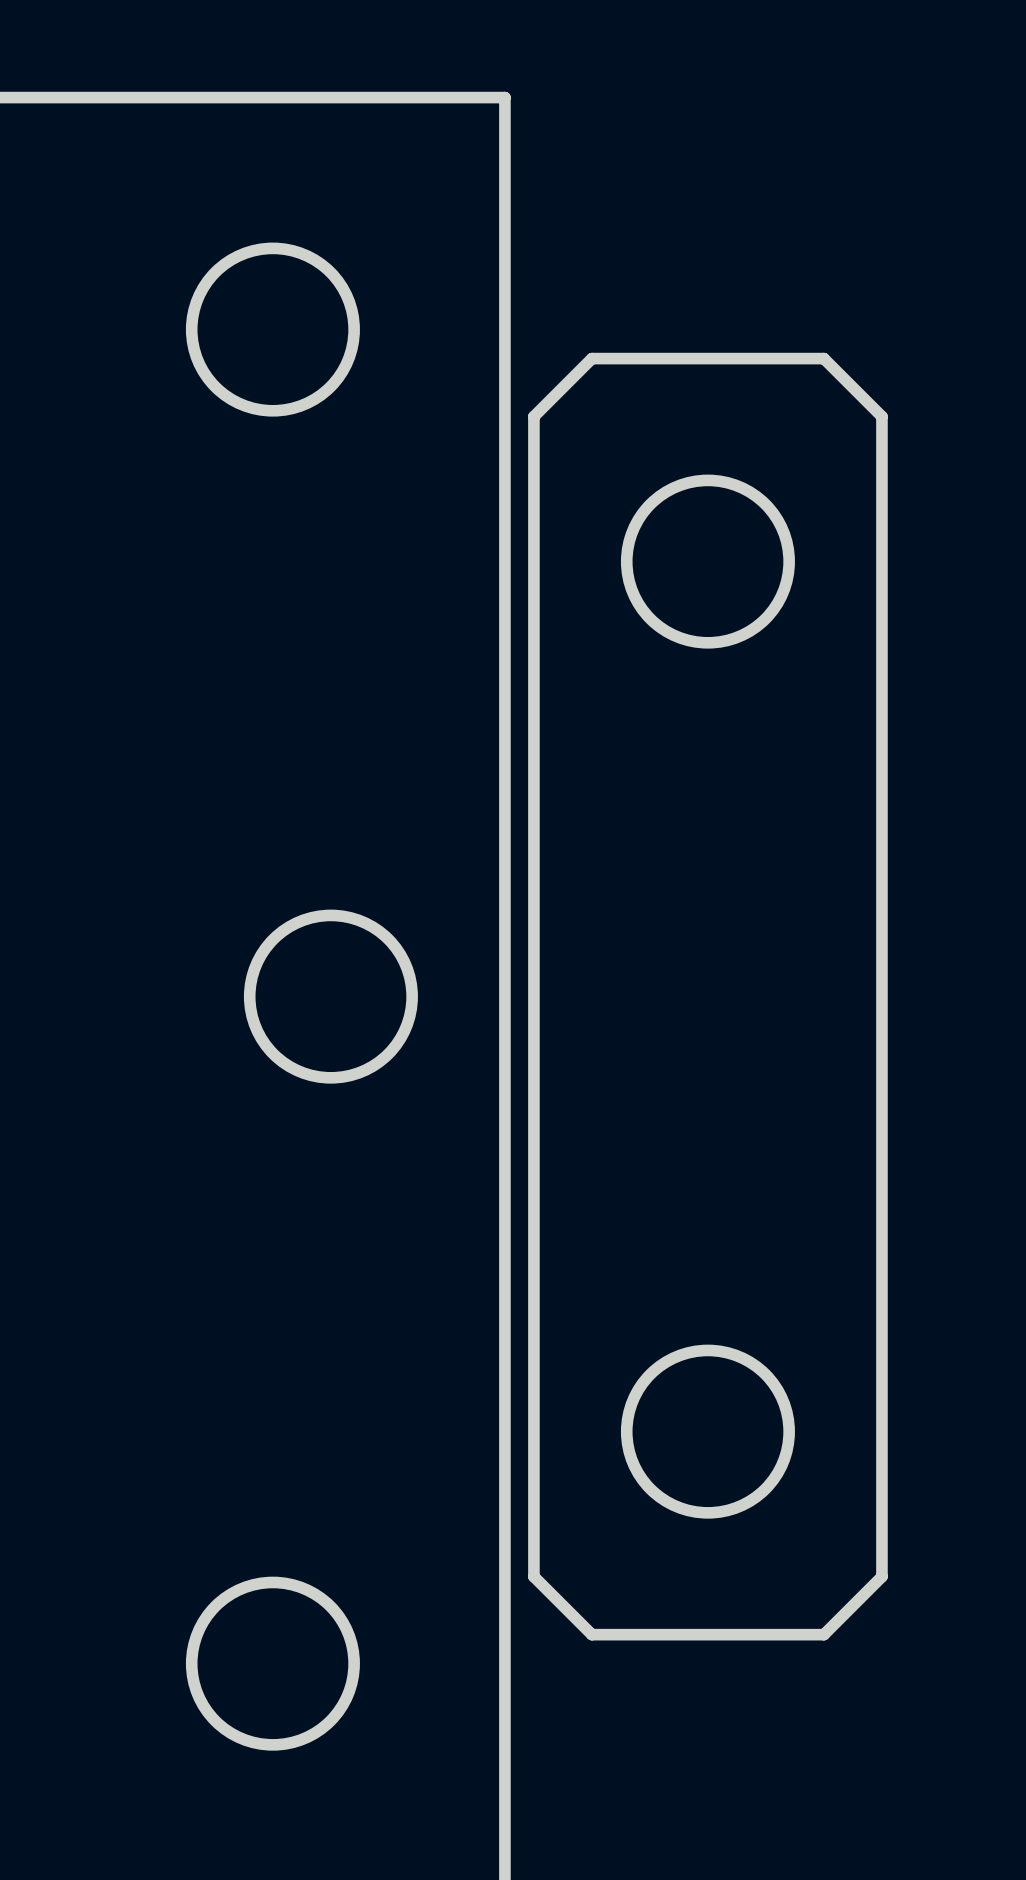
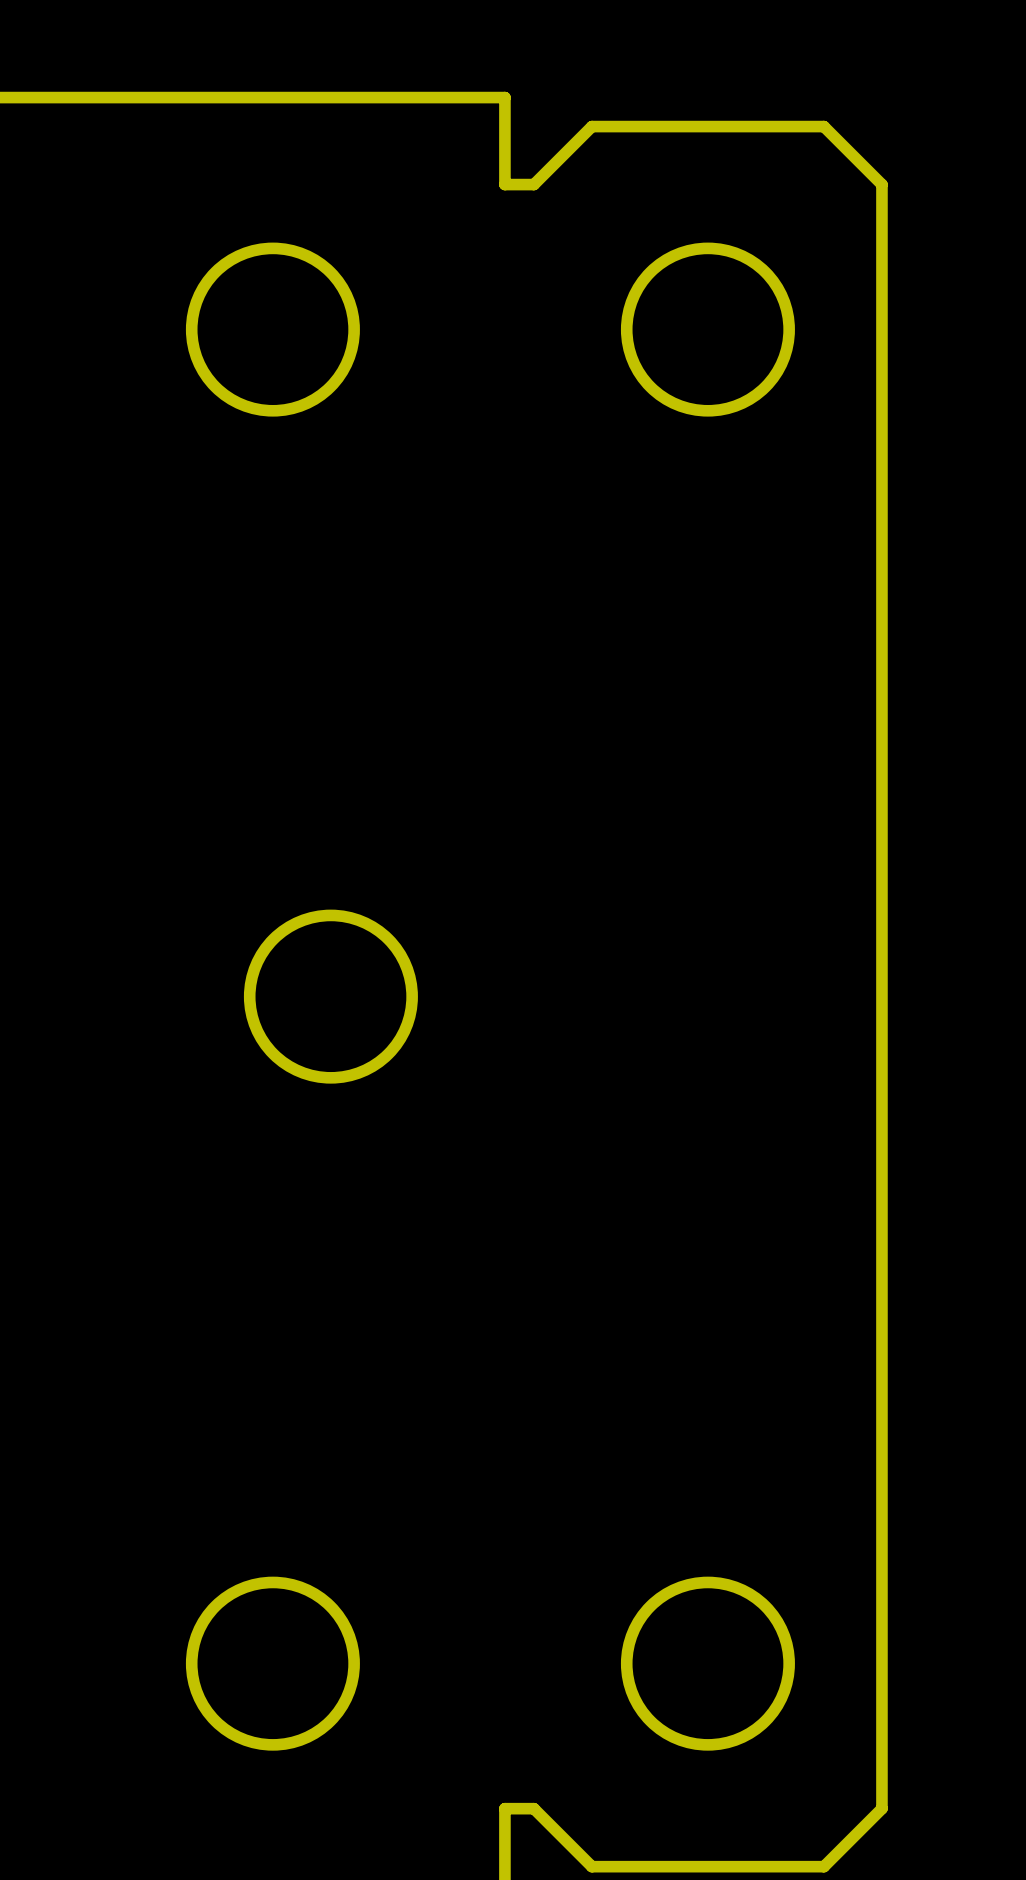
board edge: (504, 184) (504, 1808) -> (504, 184) (533, 184) (591, 126) (823, 126) (881, 184) (881, 416)
board edge: (881, 416) (823, 358) (591, 358) (533, 416) (533, 1576) (591, 1634) (823, 1634) (881, 1576) -> (504, 1808) (533, 1808) (591, 1866) (823, 1866) (881, 1808) (881, 1576)
round board edge position: (707, 561) -> (707, 329)
round board edge position: (707, 1431) -> (707, 1663)

